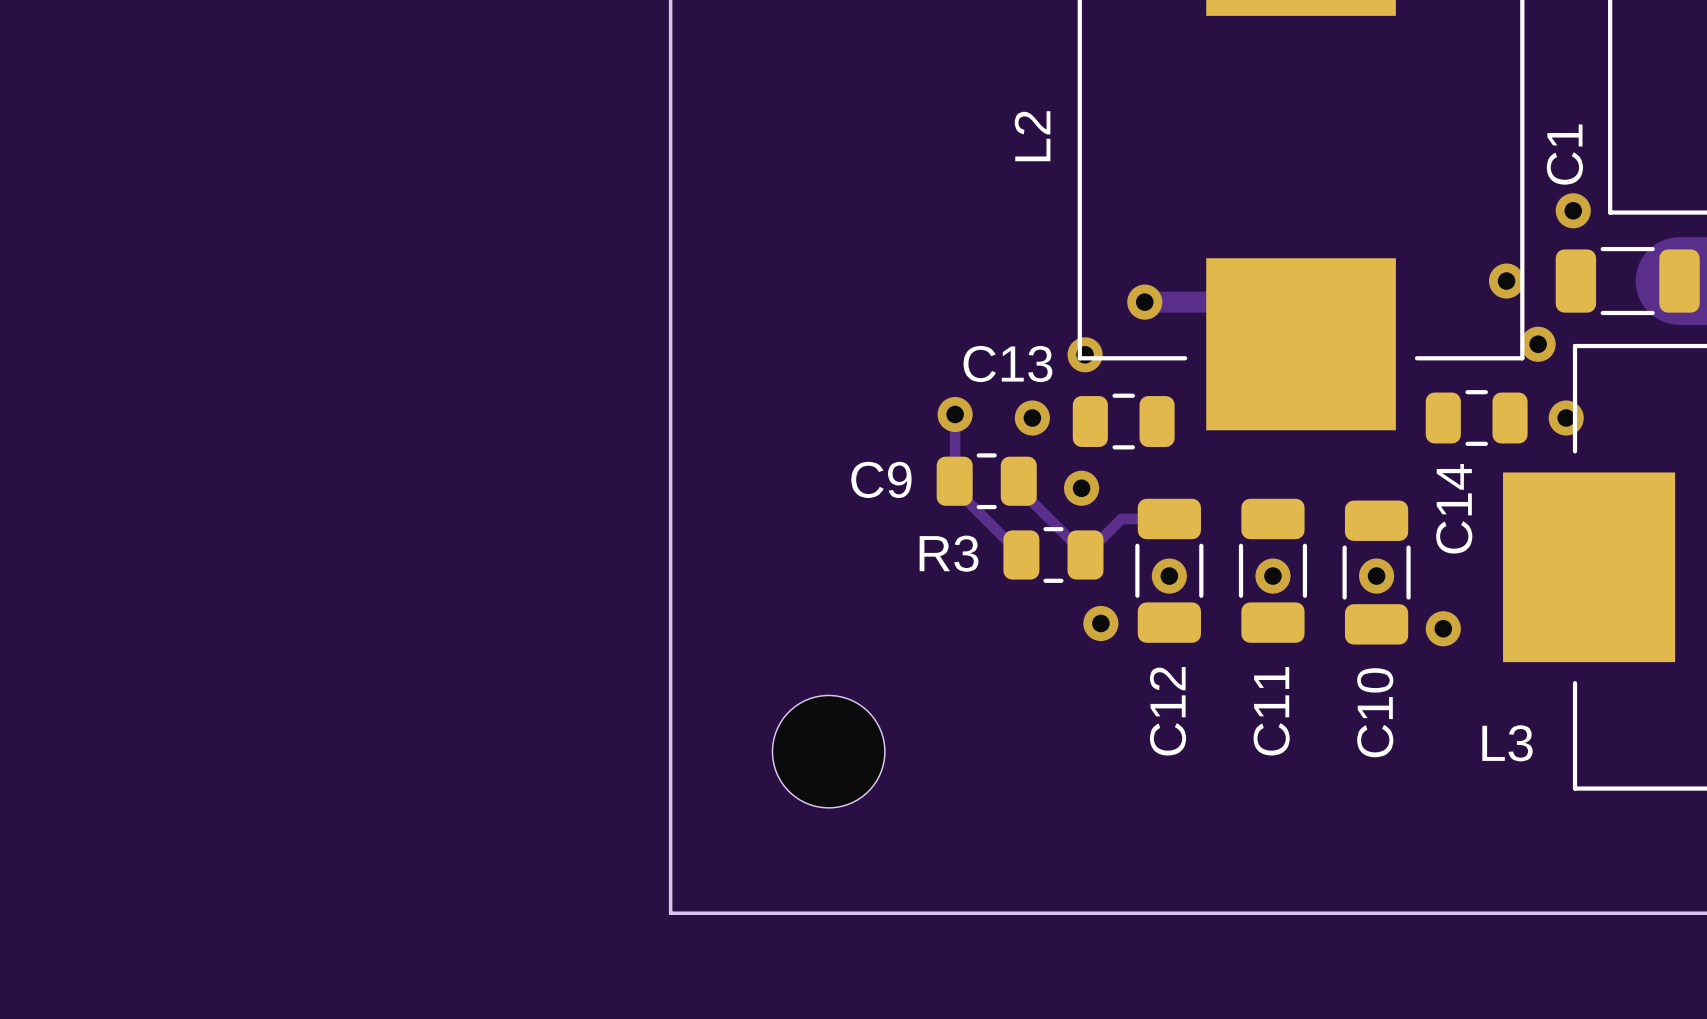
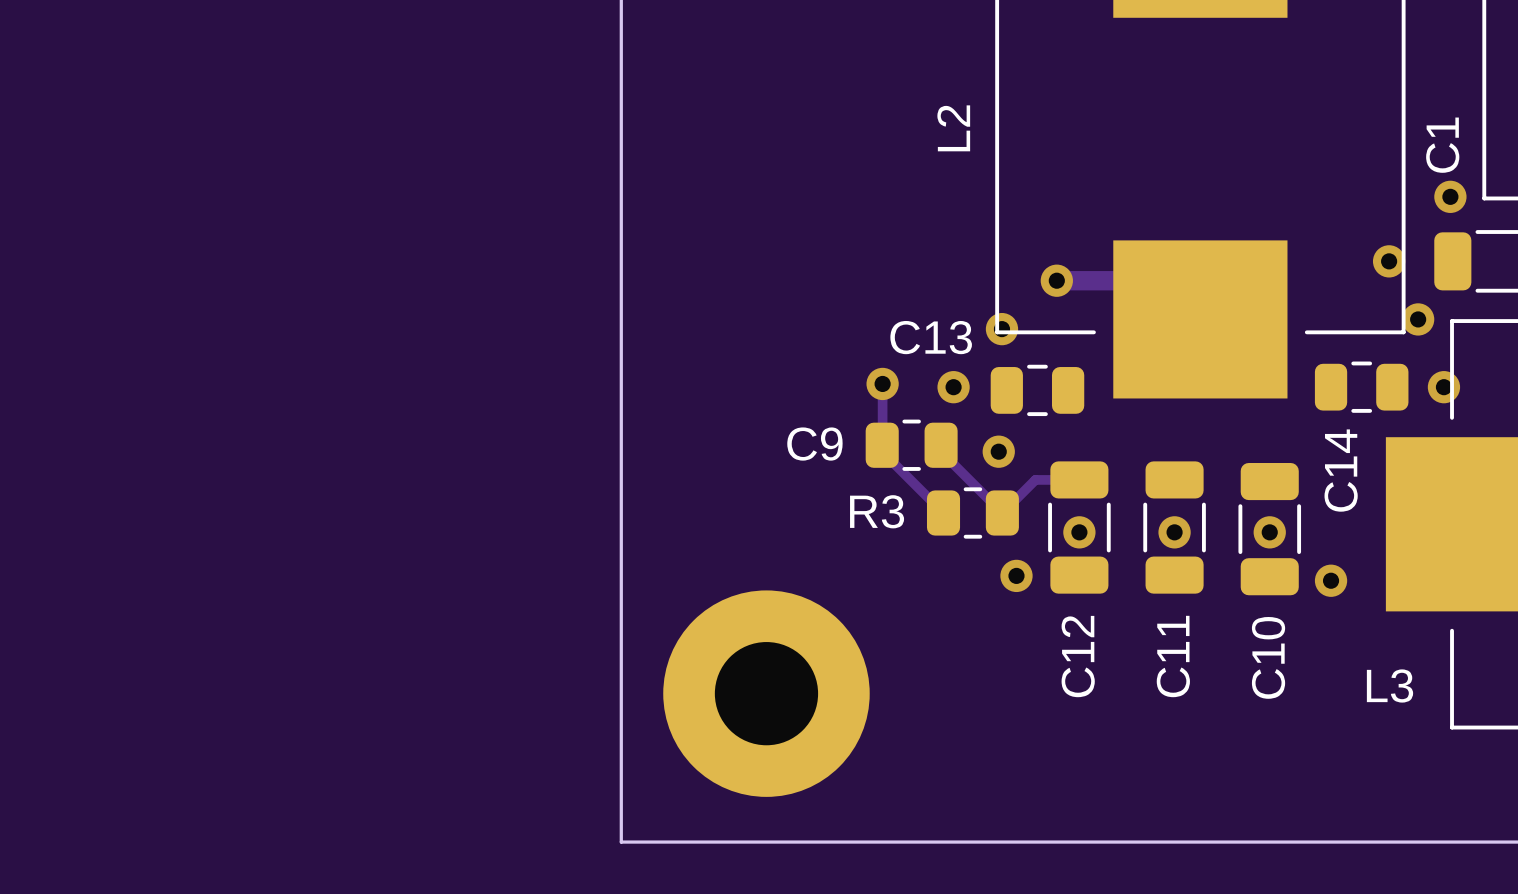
part footprint: [772, 695, 885, 808] -> [663, 590, 870, 797]

